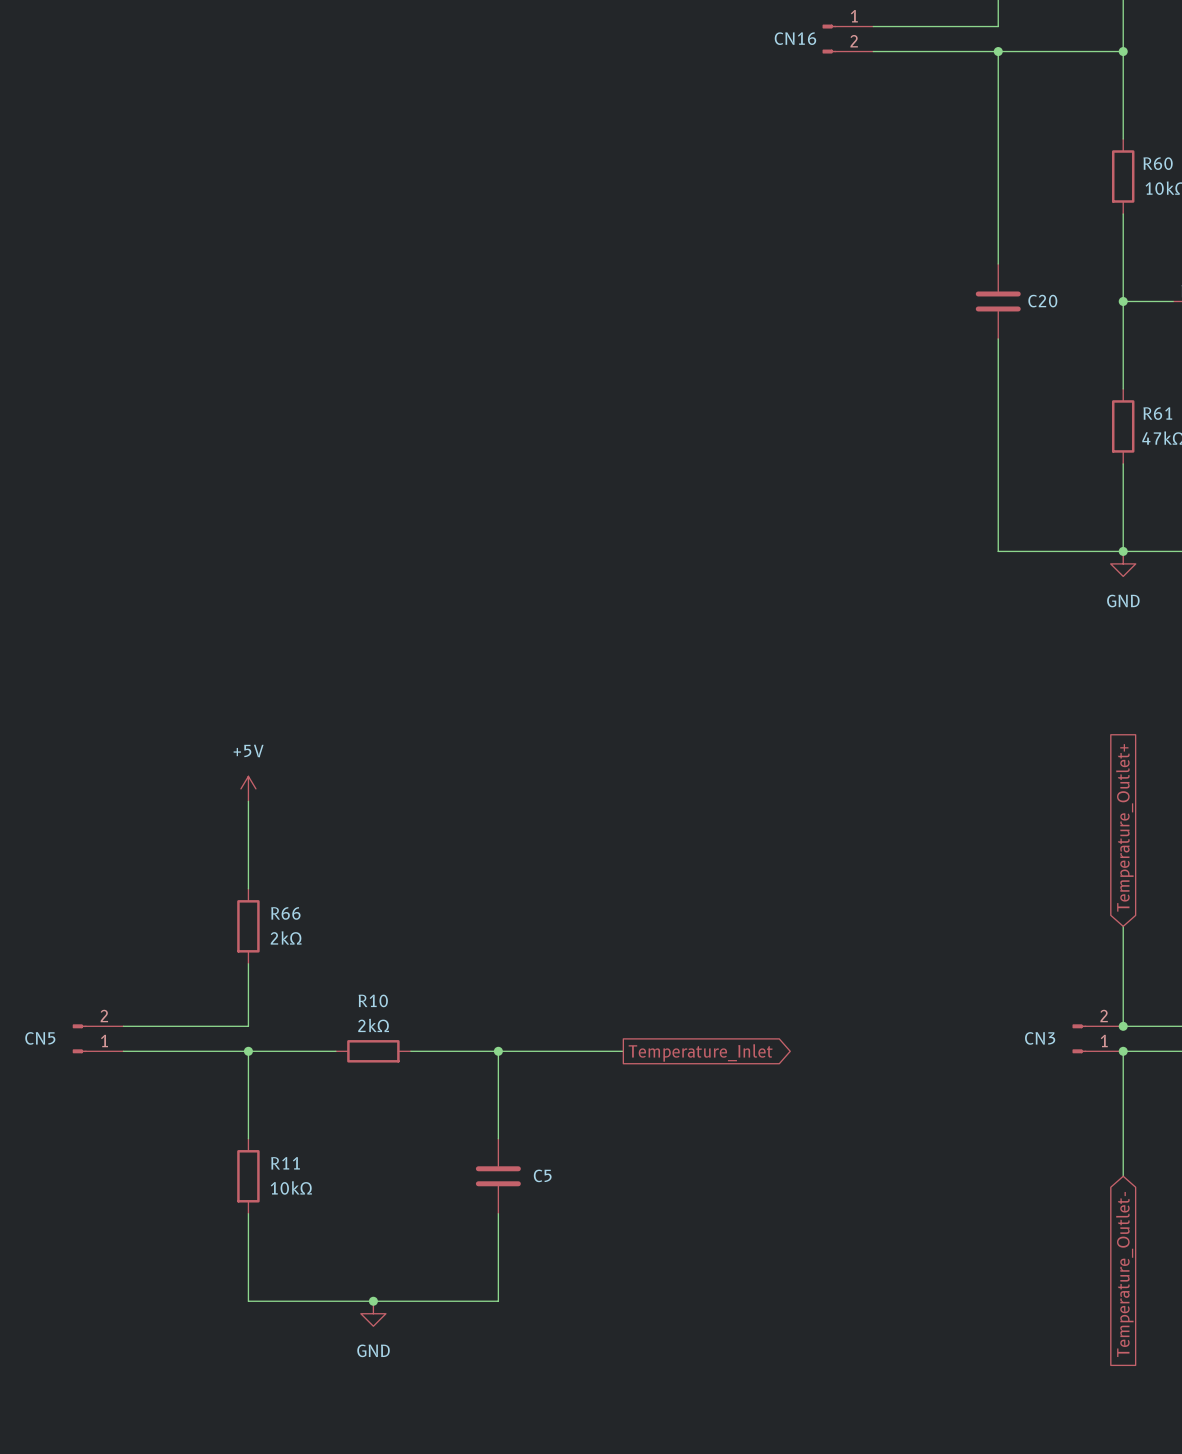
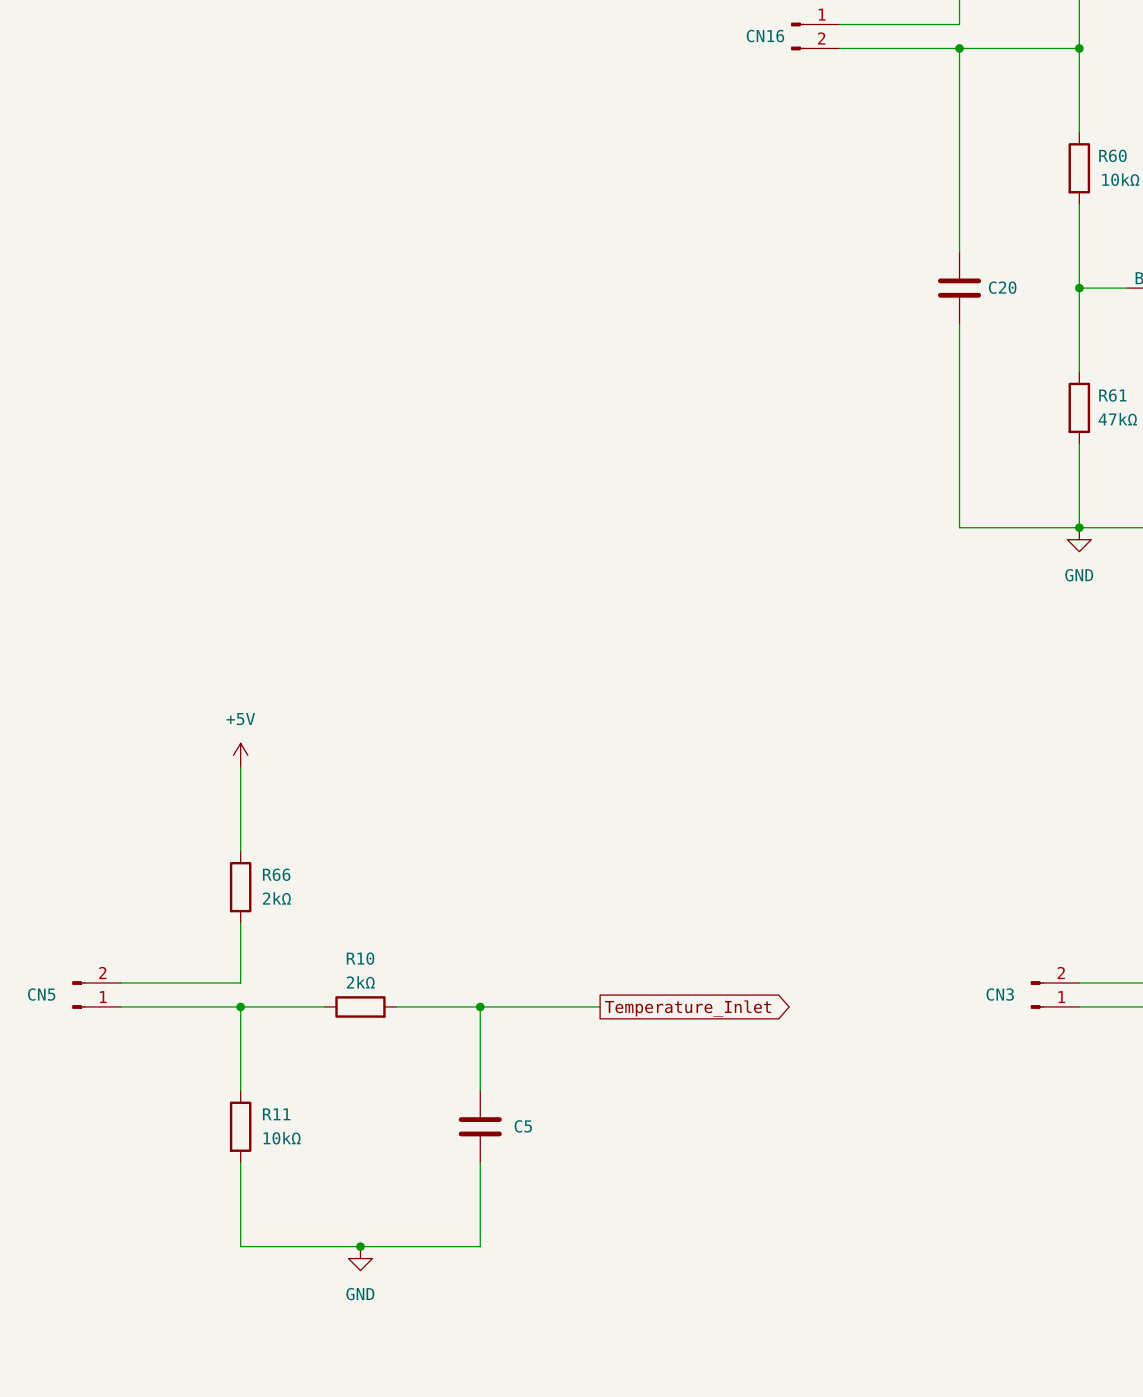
global label: Temperature_Outlet+ (1124, 827) -> none
wire: (1123, 926) (1123, 1026) -> none
junction: (1123, 1026) -> none
wire: (1123, 1051) (1123, 1176) -> none
junction: (1123, 1051) -> none
global label: Temperature_Outlet- (1124, 1274) -> none

